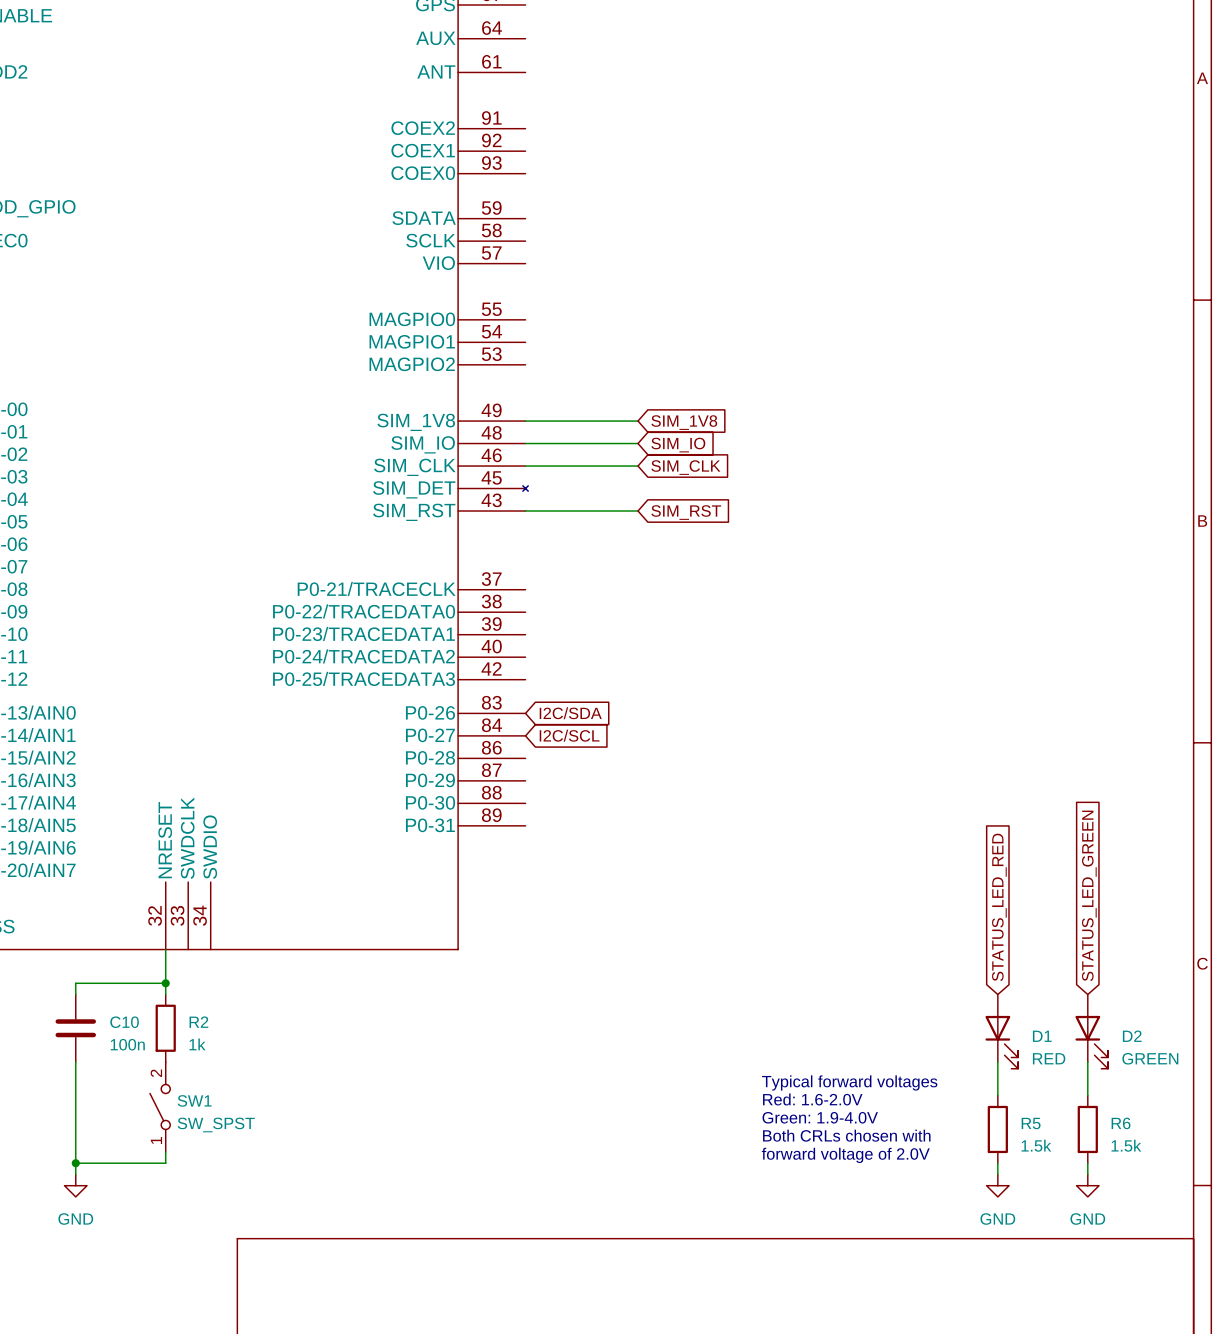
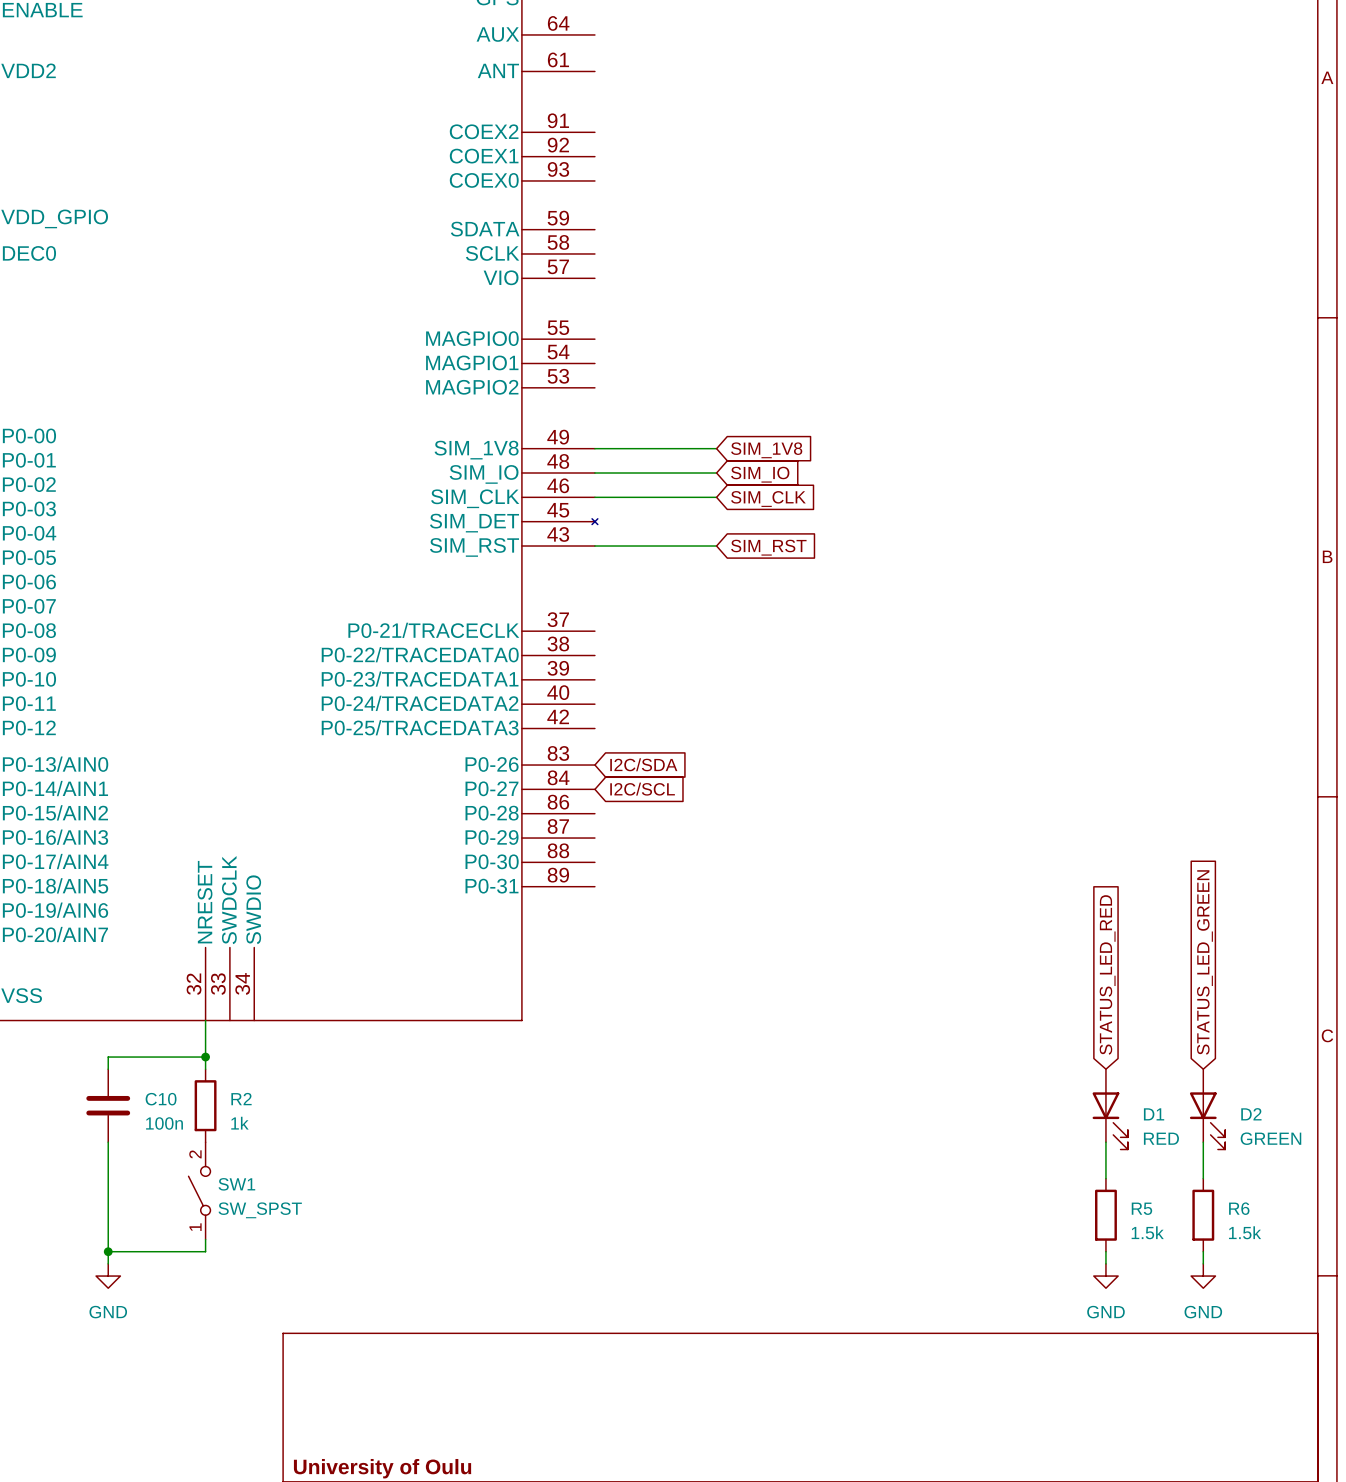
text: Typical forward voltages (849, 1082) -> none
text: Red: 1.6-2.0V (812, 1099) -> none
text: Green: 1.9-4.0V (820, 1117) -> none
text: Both CRLs chosen with (846, 1135) -> none
text: forward voltage of 2.0V (845, 1155) -> none

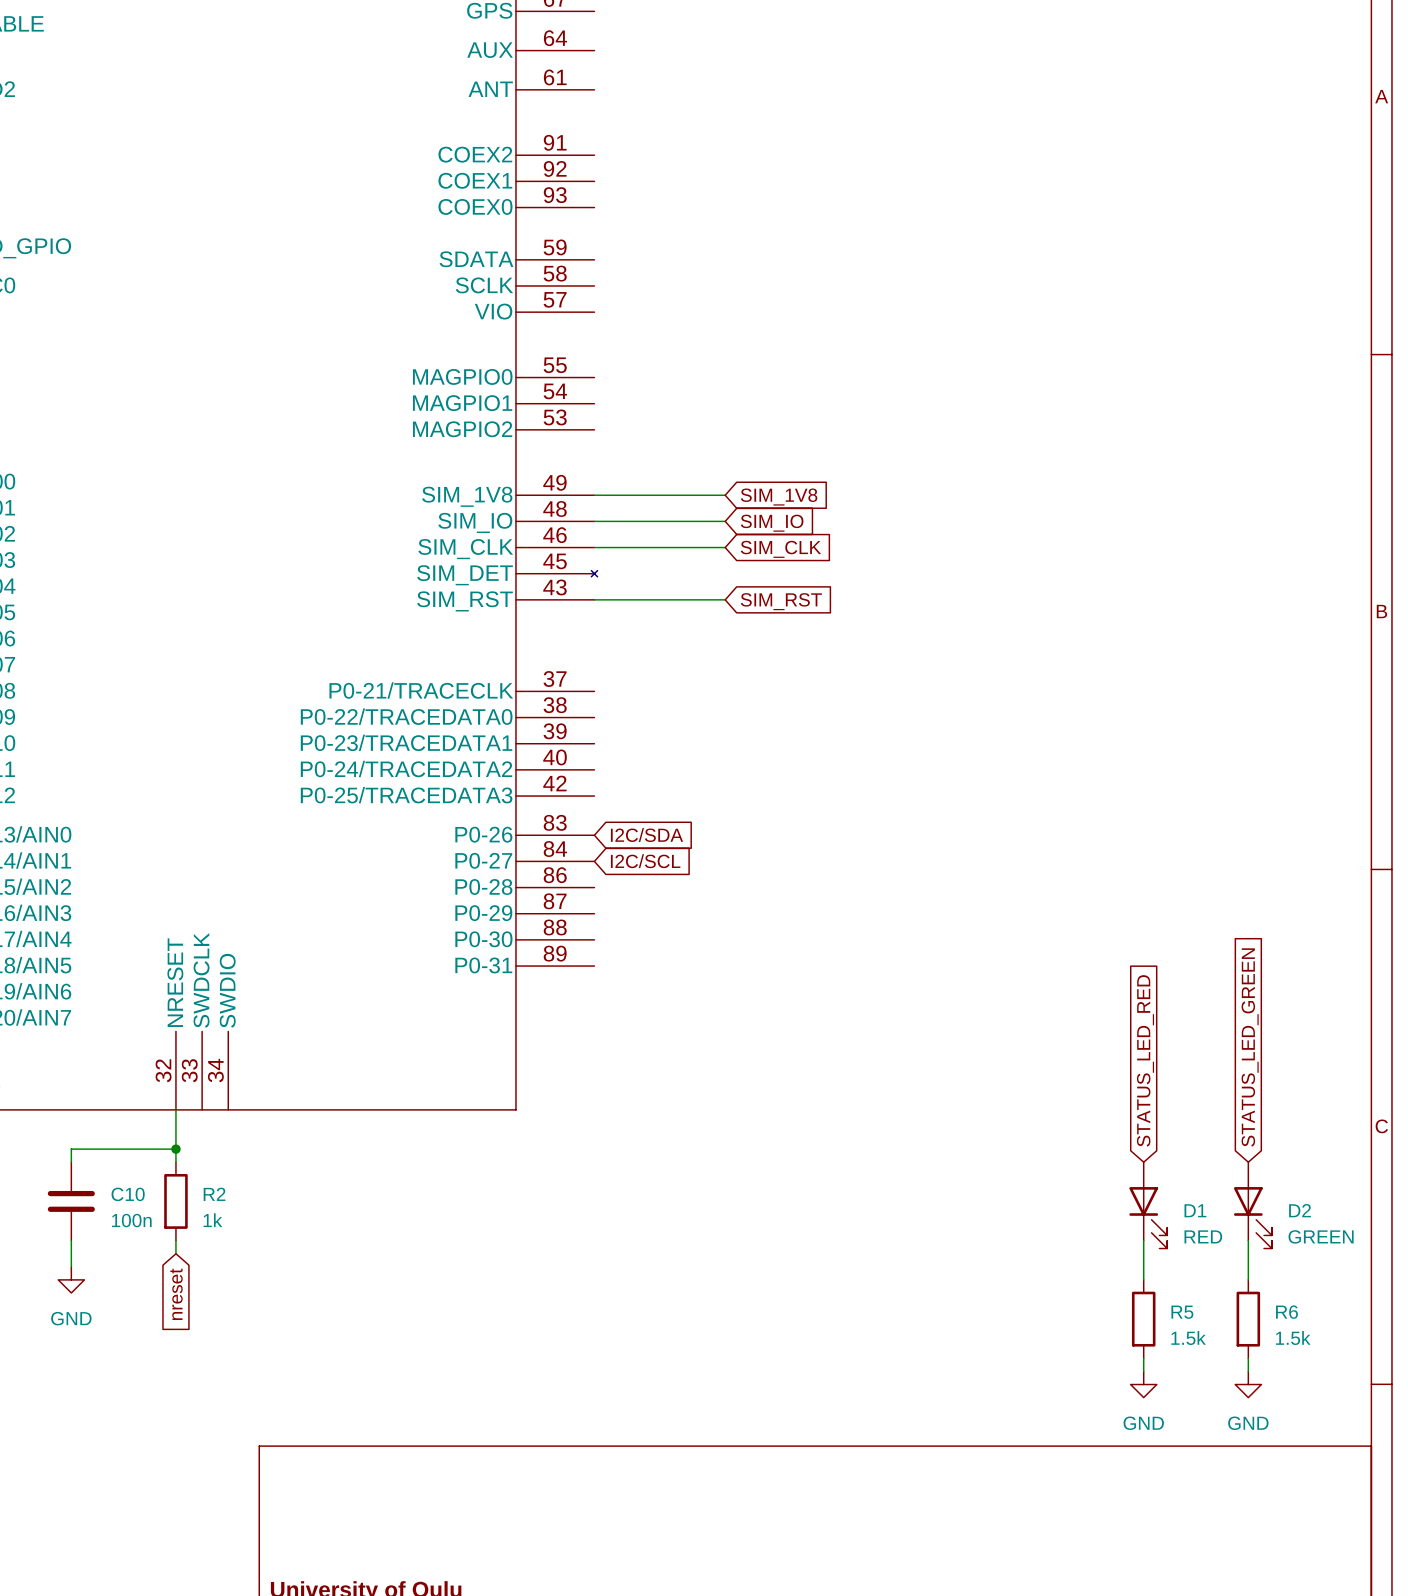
wire: (108, 1166) (108, 1263) -> none
SW1: SW_SPST (199, 1190) -> none
global label: none -> nreset (176, 1294)
wire: (205, 1239) (205, 1251) (108, 1251) -> none
junction: (108, 1251) -> none
power symbol position: GND (108, 1276) -> GND (71, 1279)

